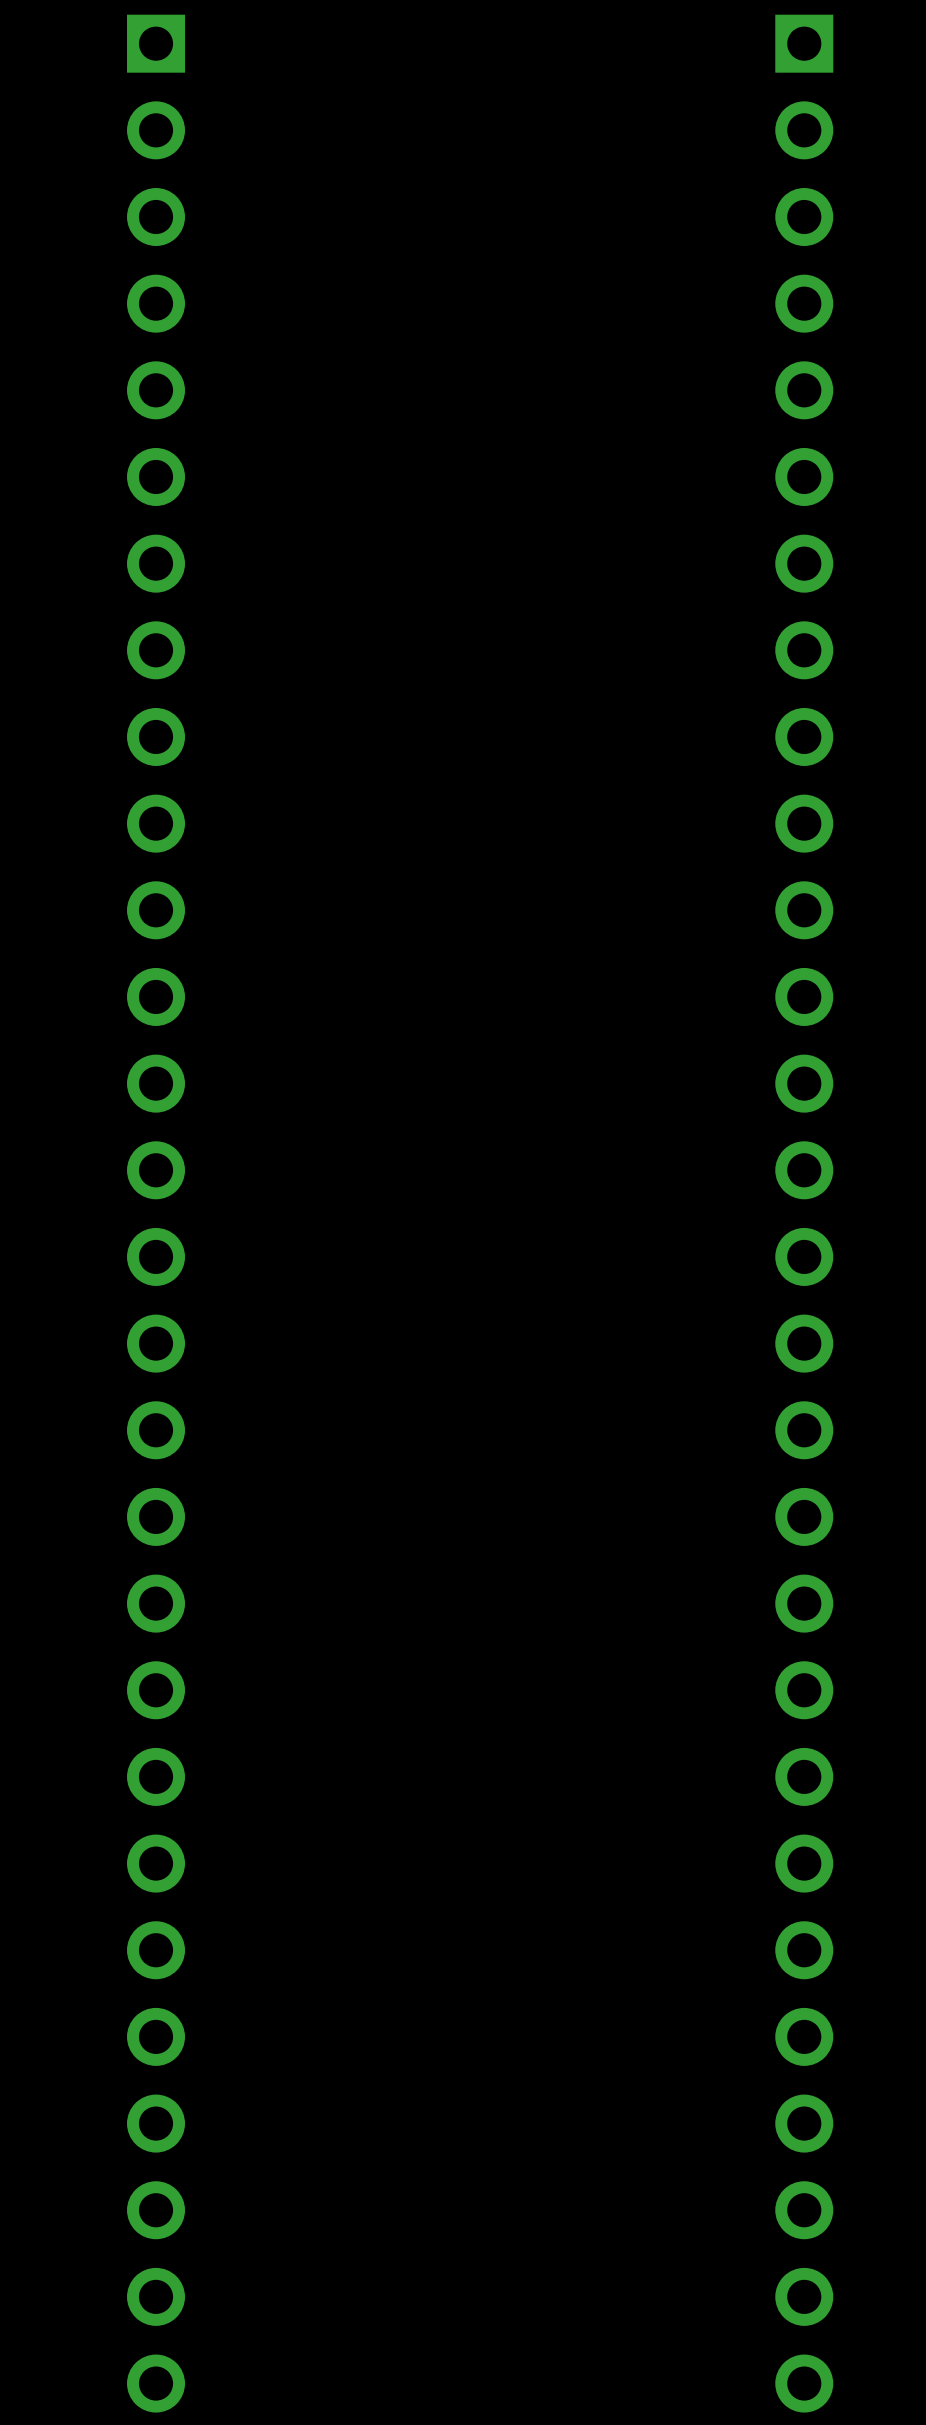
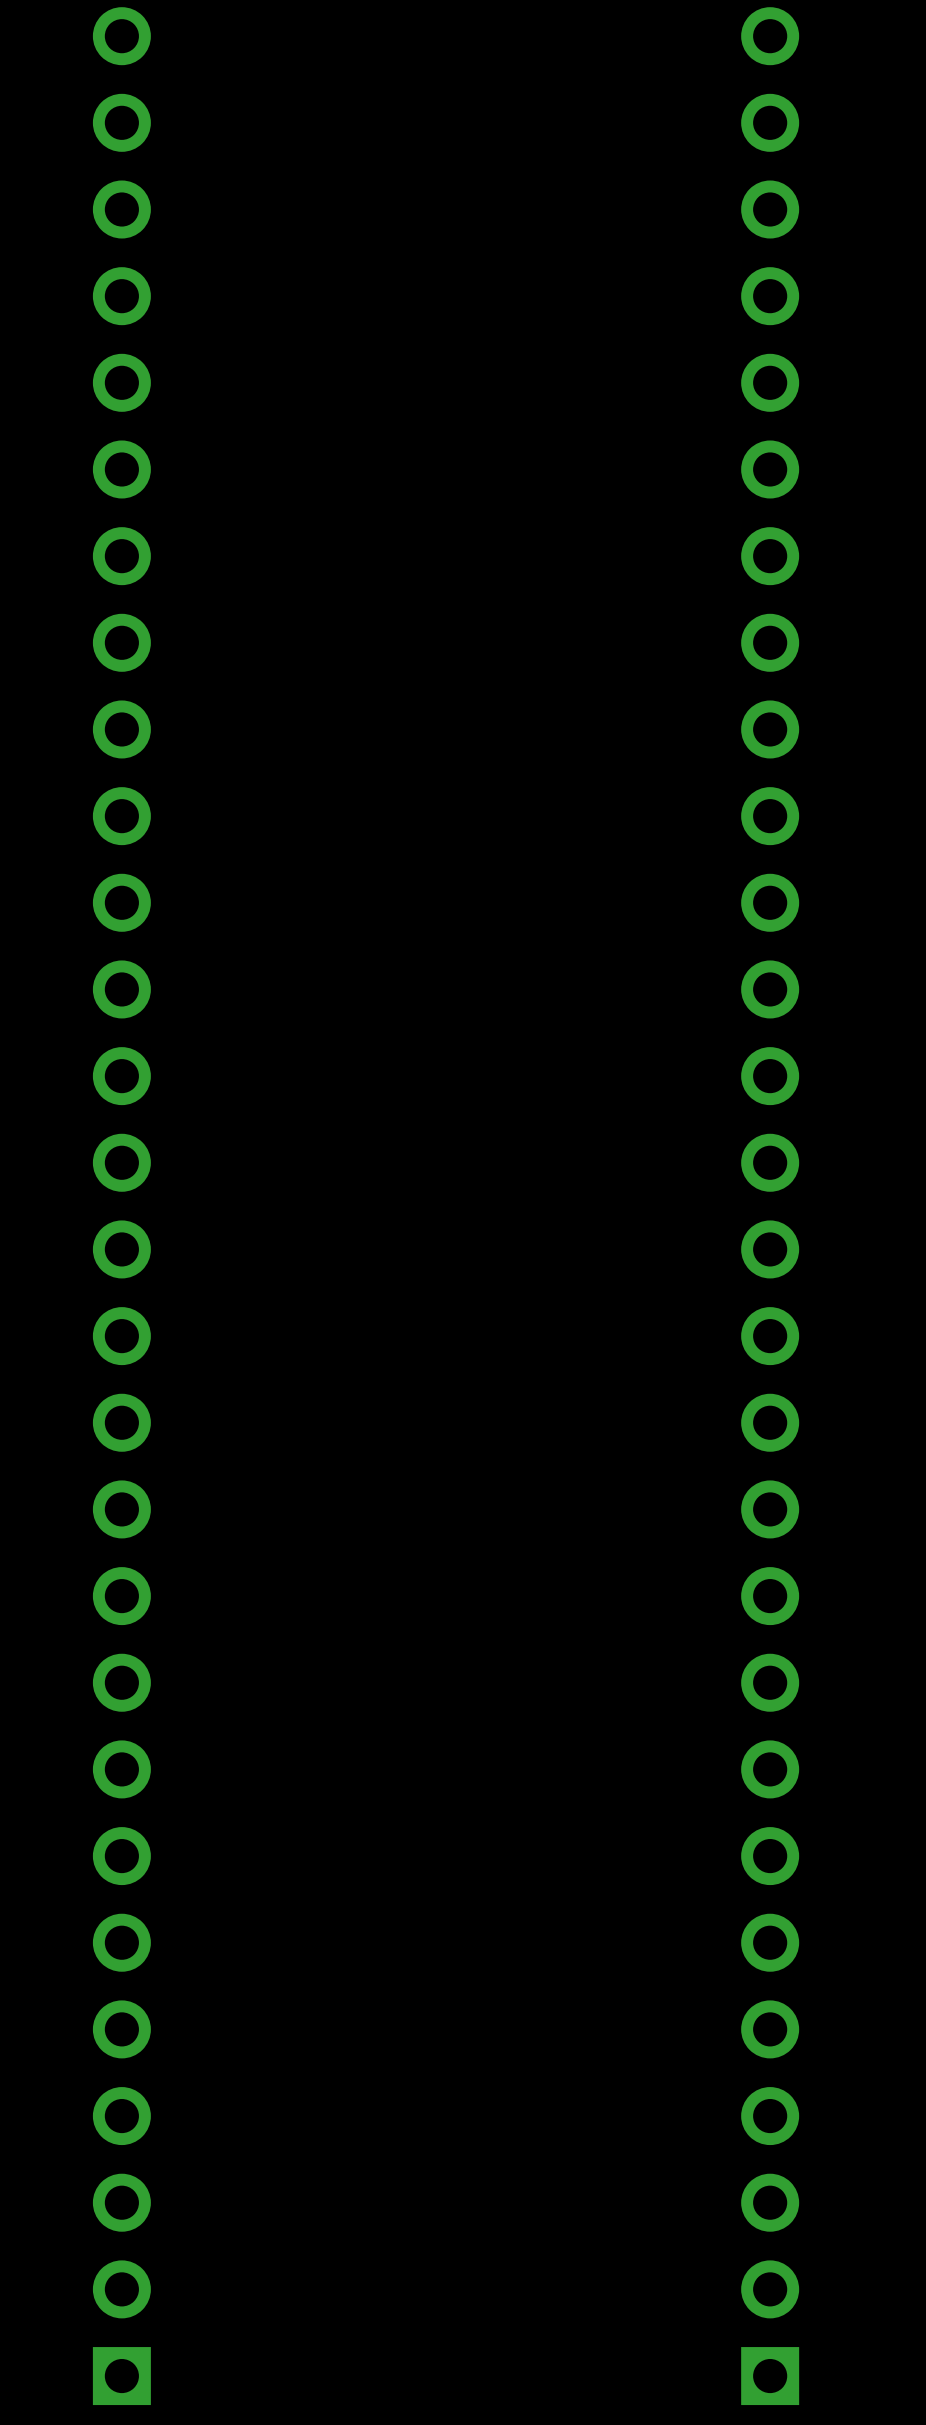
part rotation: 0° (156, 1213) -> 180° (121, 1206)
part rotation: 0° (804, 1213) -> 180° (770, 1206)

